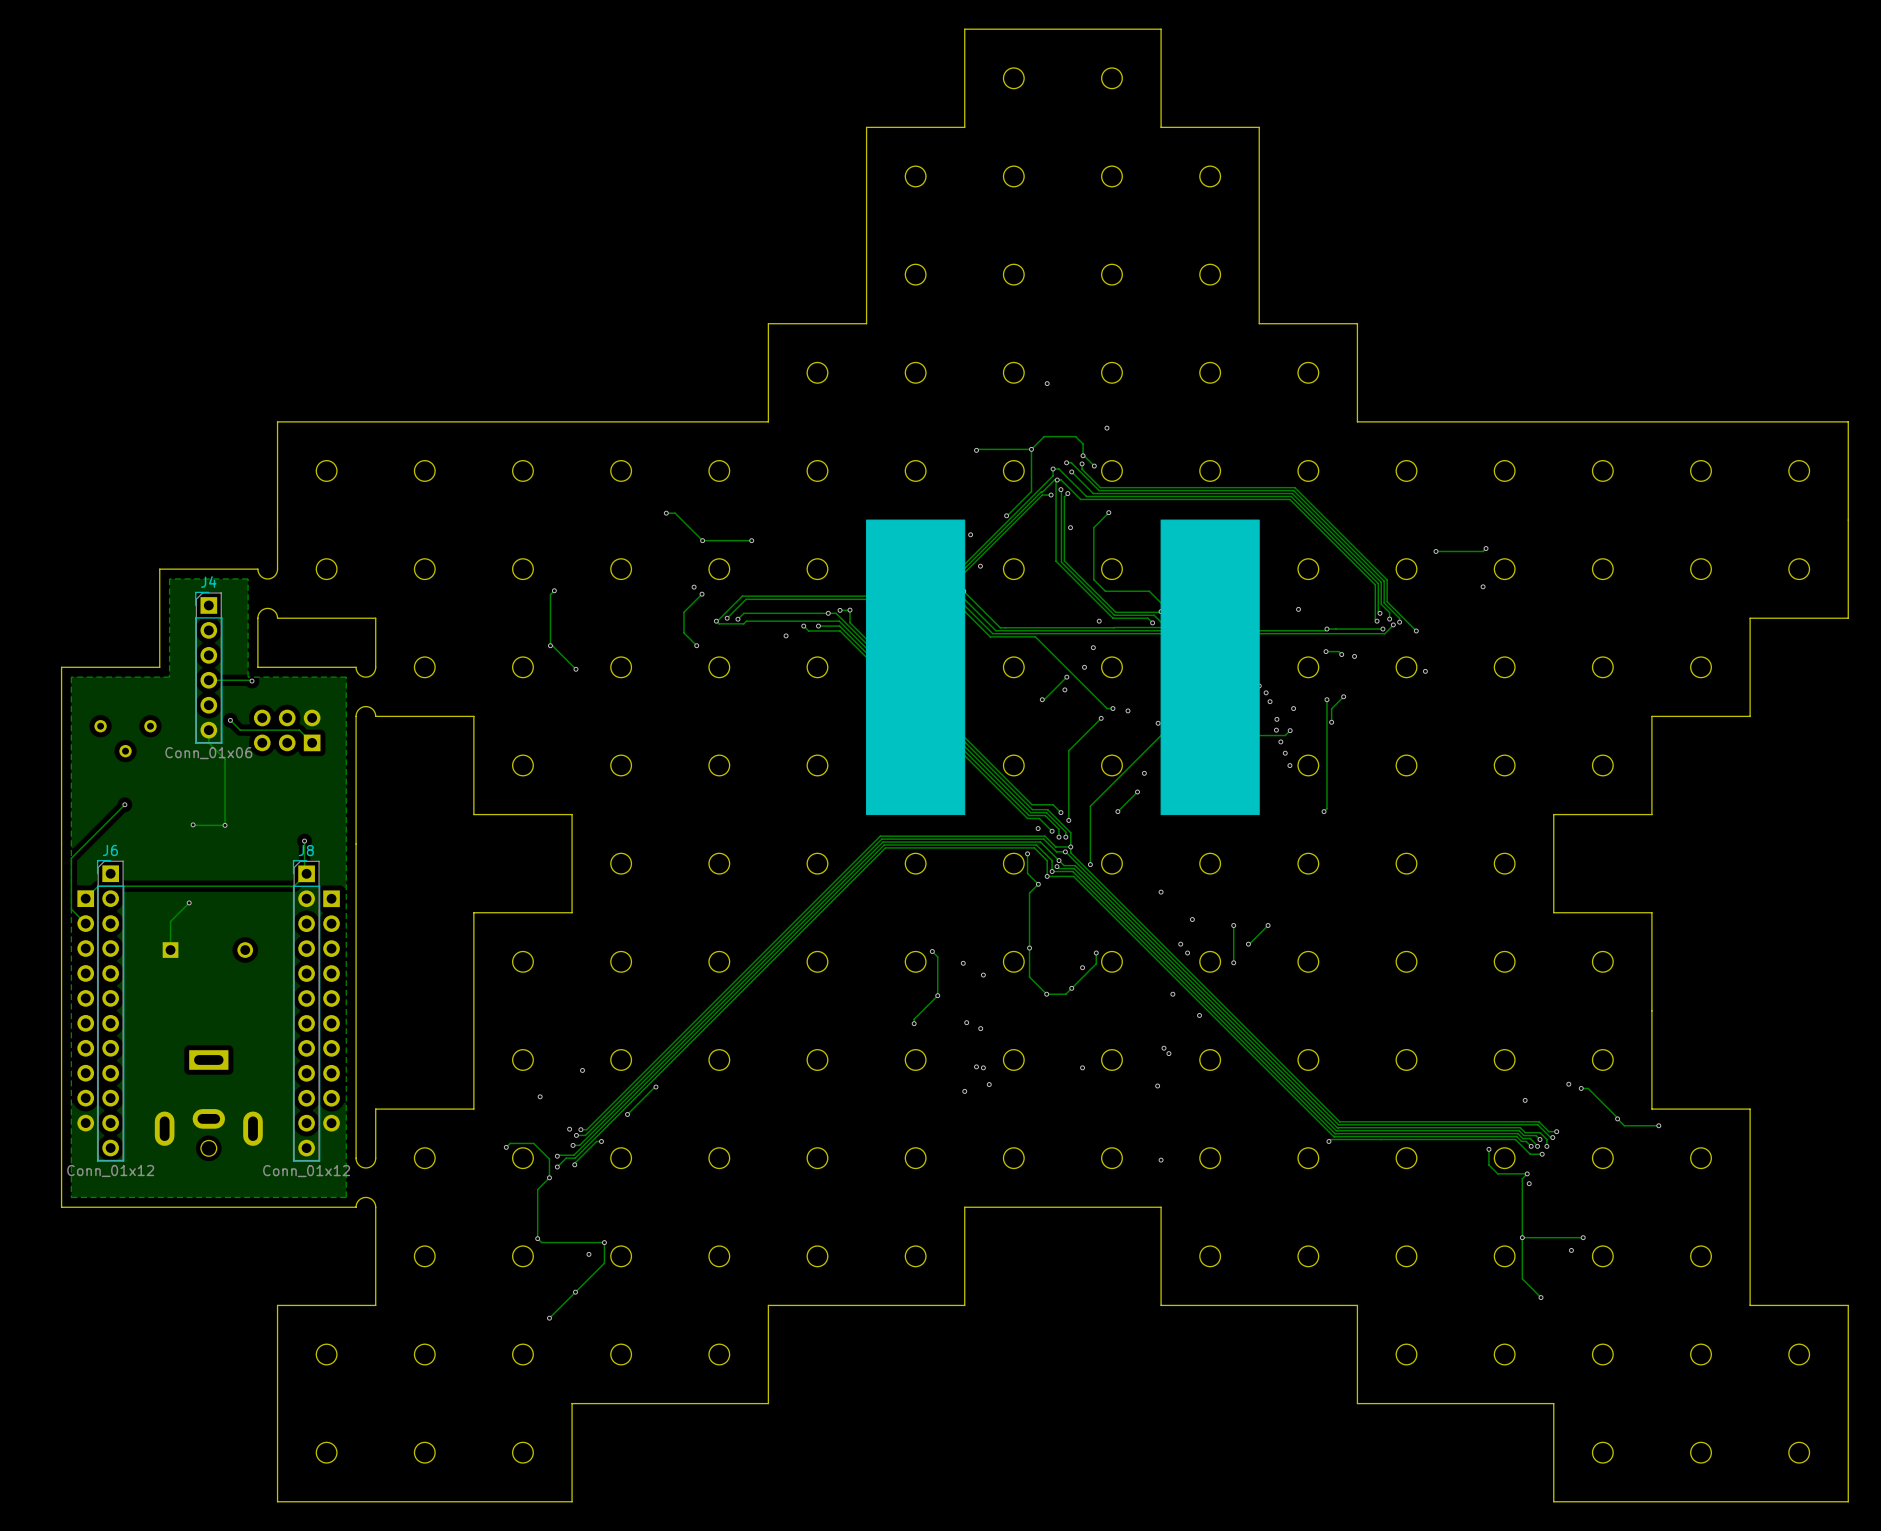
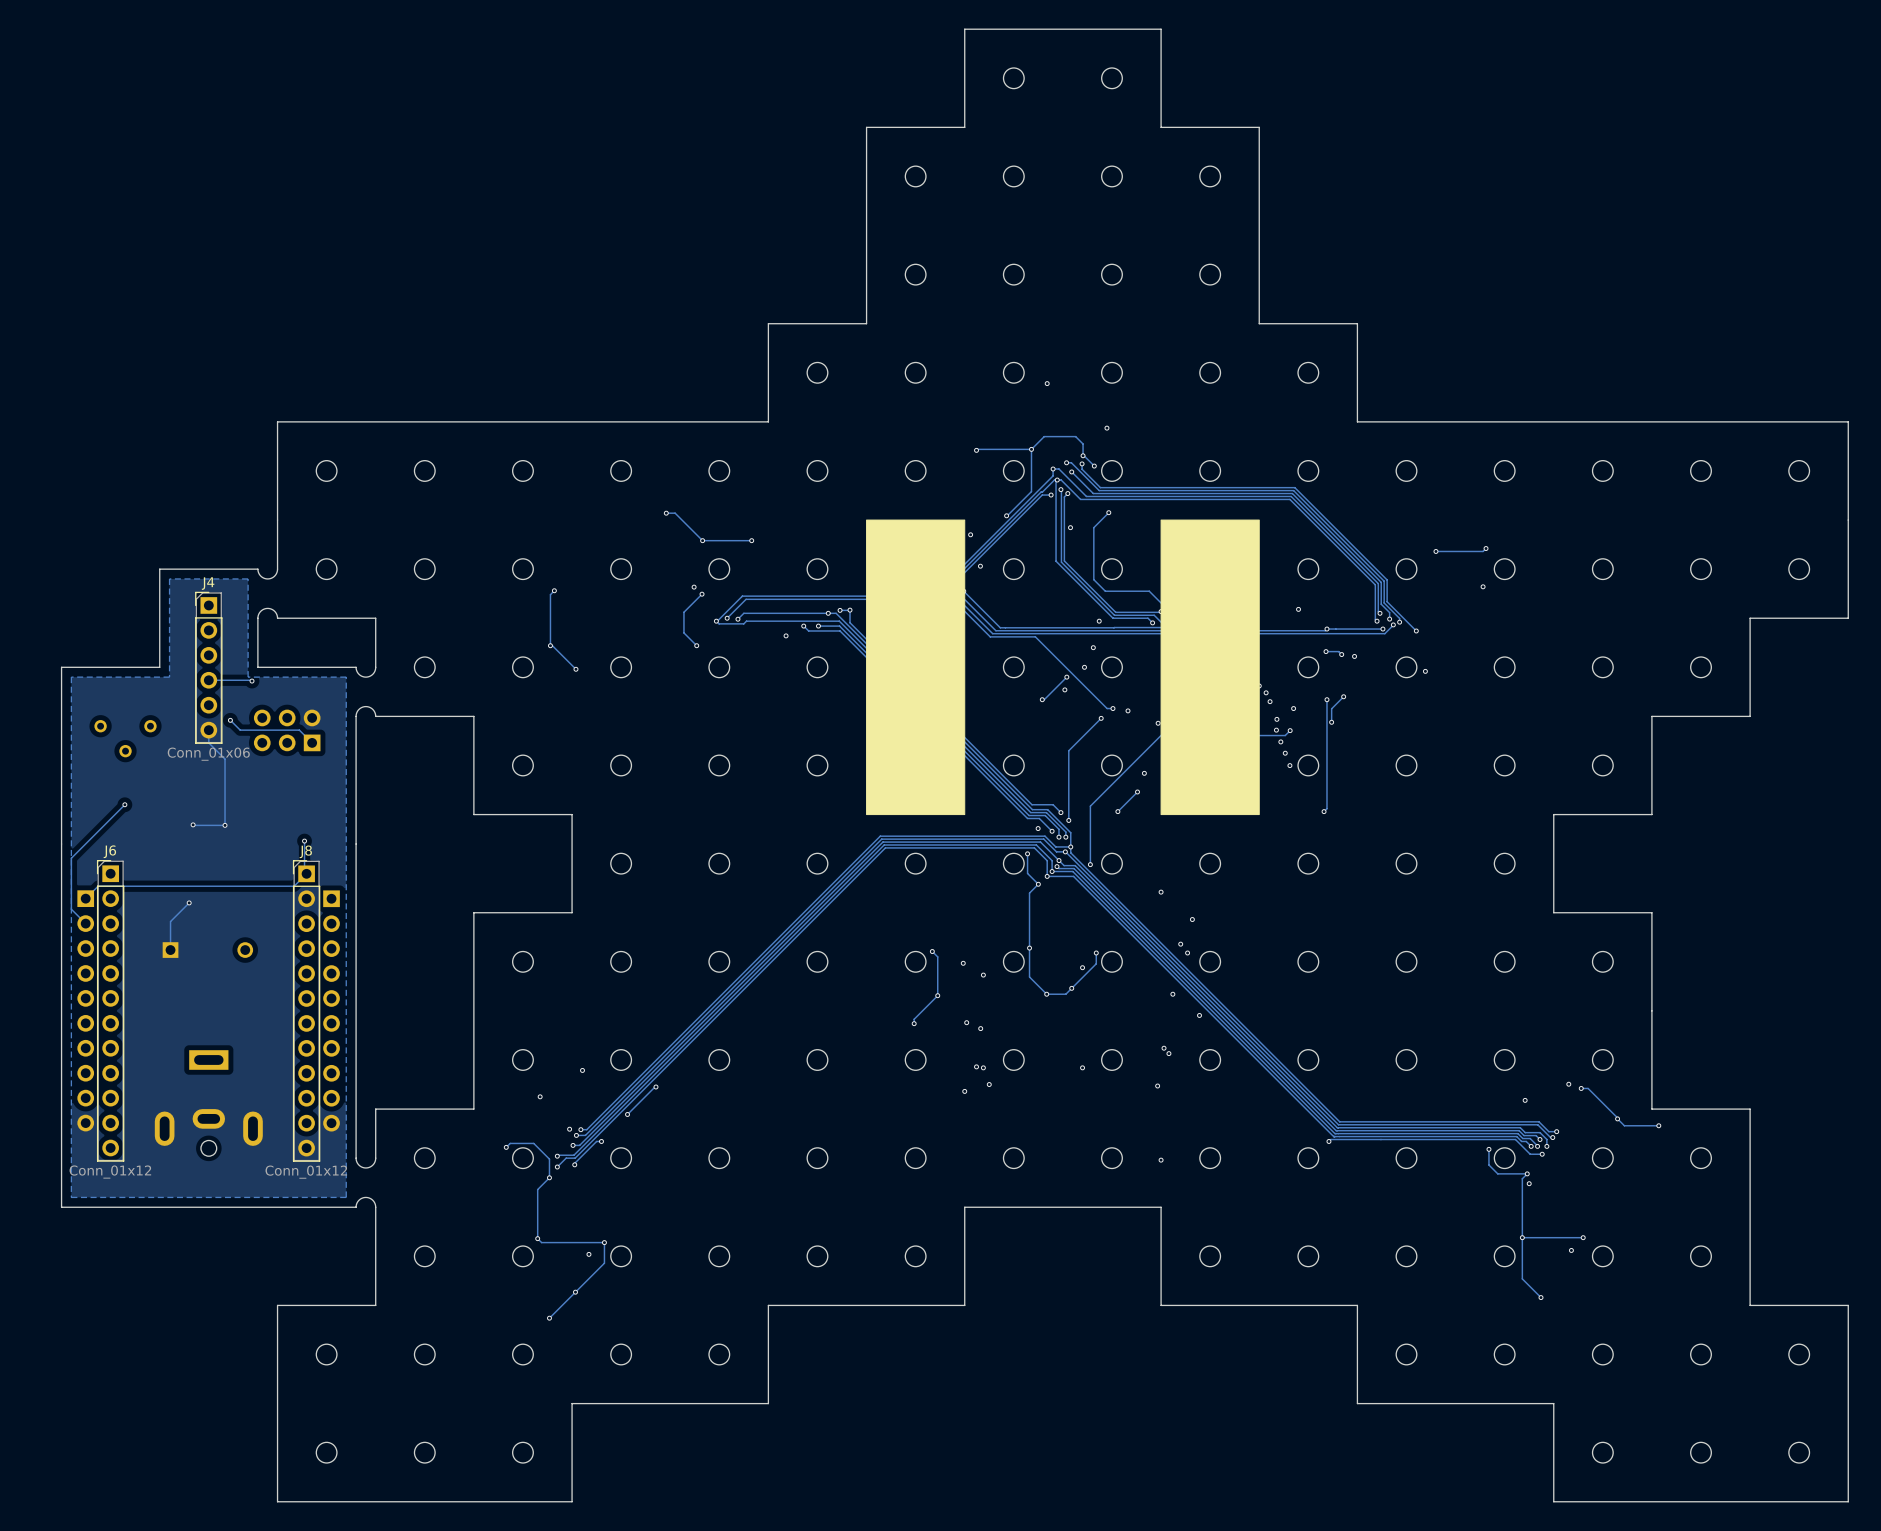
track: (1233, 925) (1233, 963) -> none
via: (1233, 925) -> none
track: (1268, 925) (1248, 944) -> none
via: (1268, 925) -> none
via: (1248, 944) -> none
via: (1233, 962) -> none

